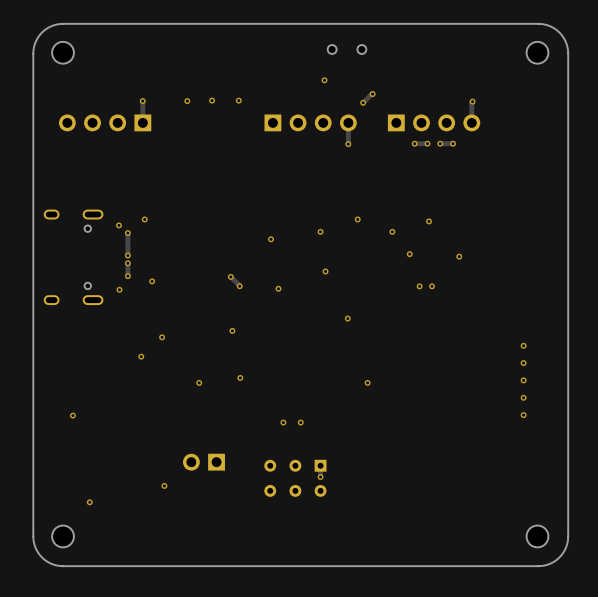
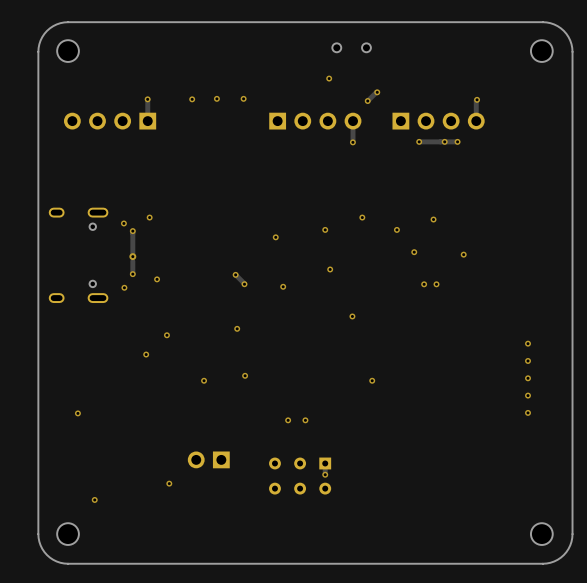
via: (427, 143) -> none
track: none -> (444, 141) (432, 141)
via: (127, 255) -> none
via: none -> (132, 256)
via: (127, 263) -> none

